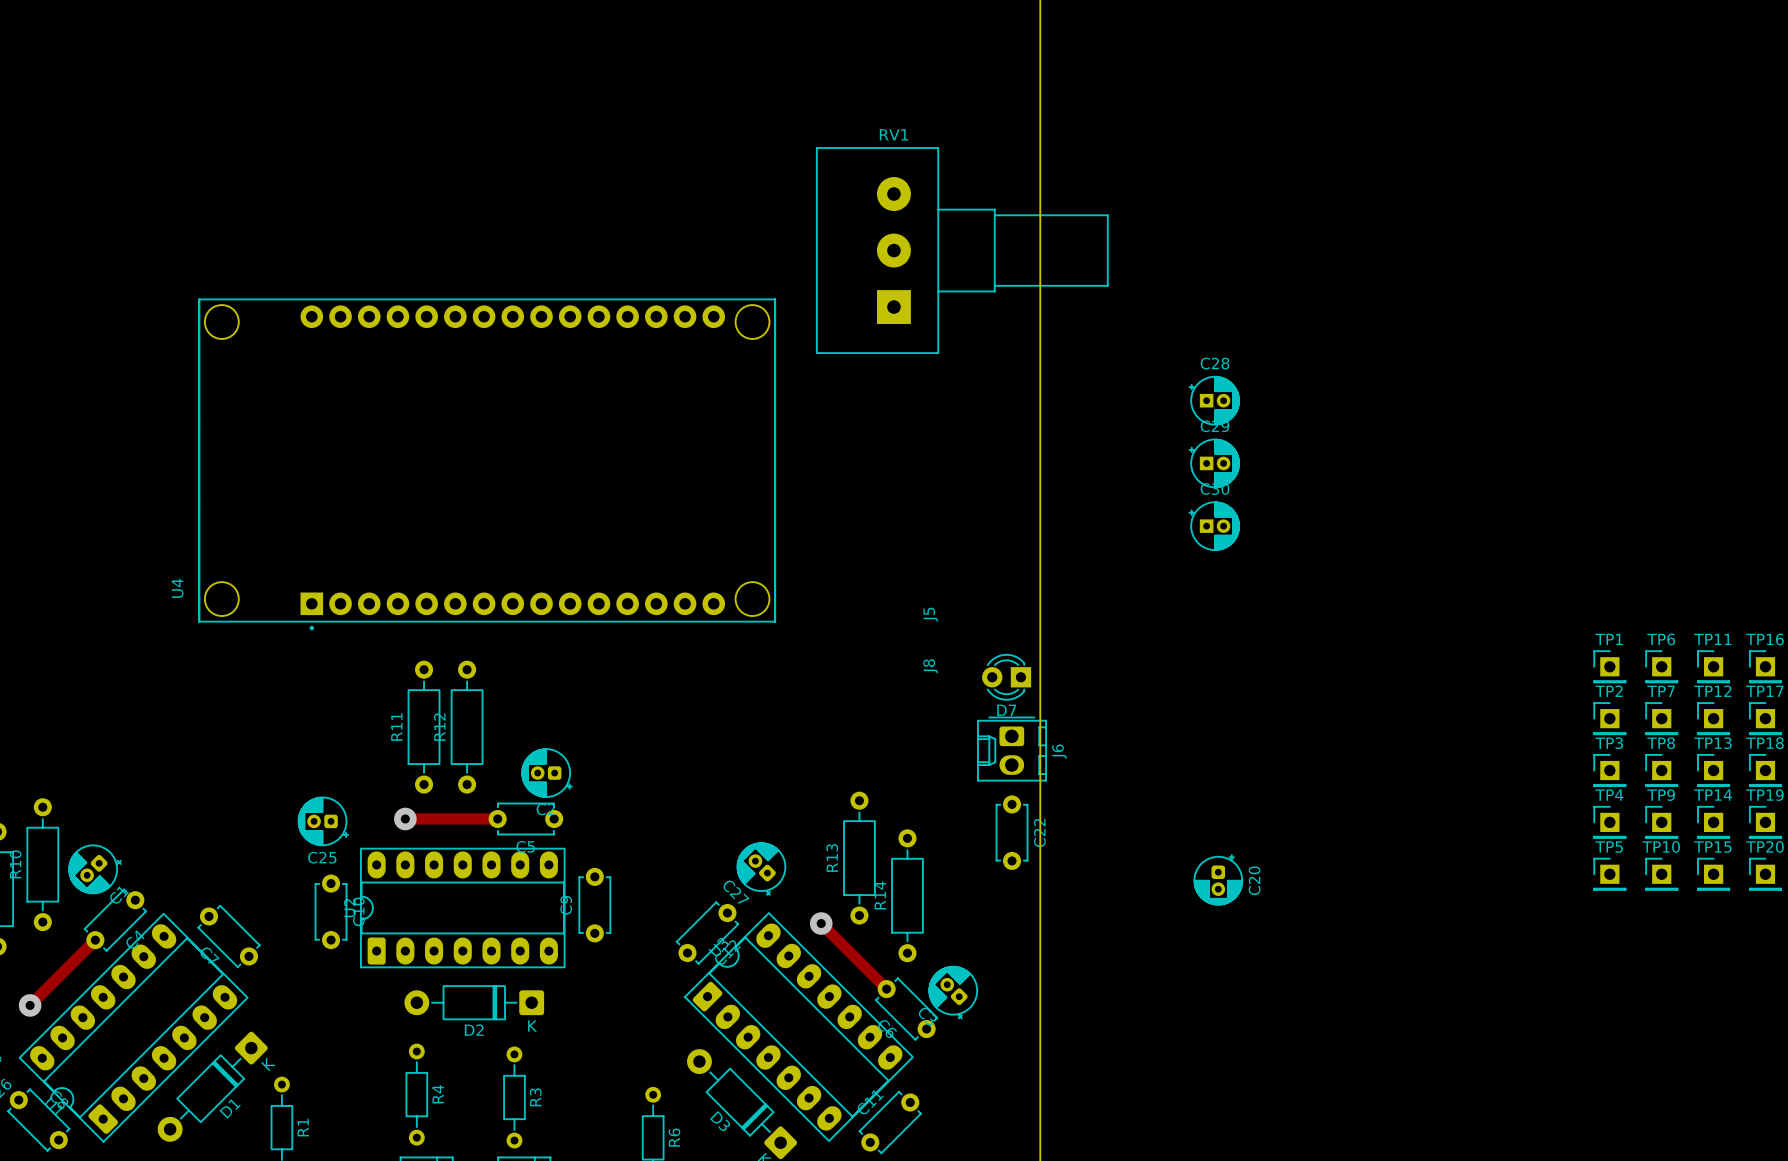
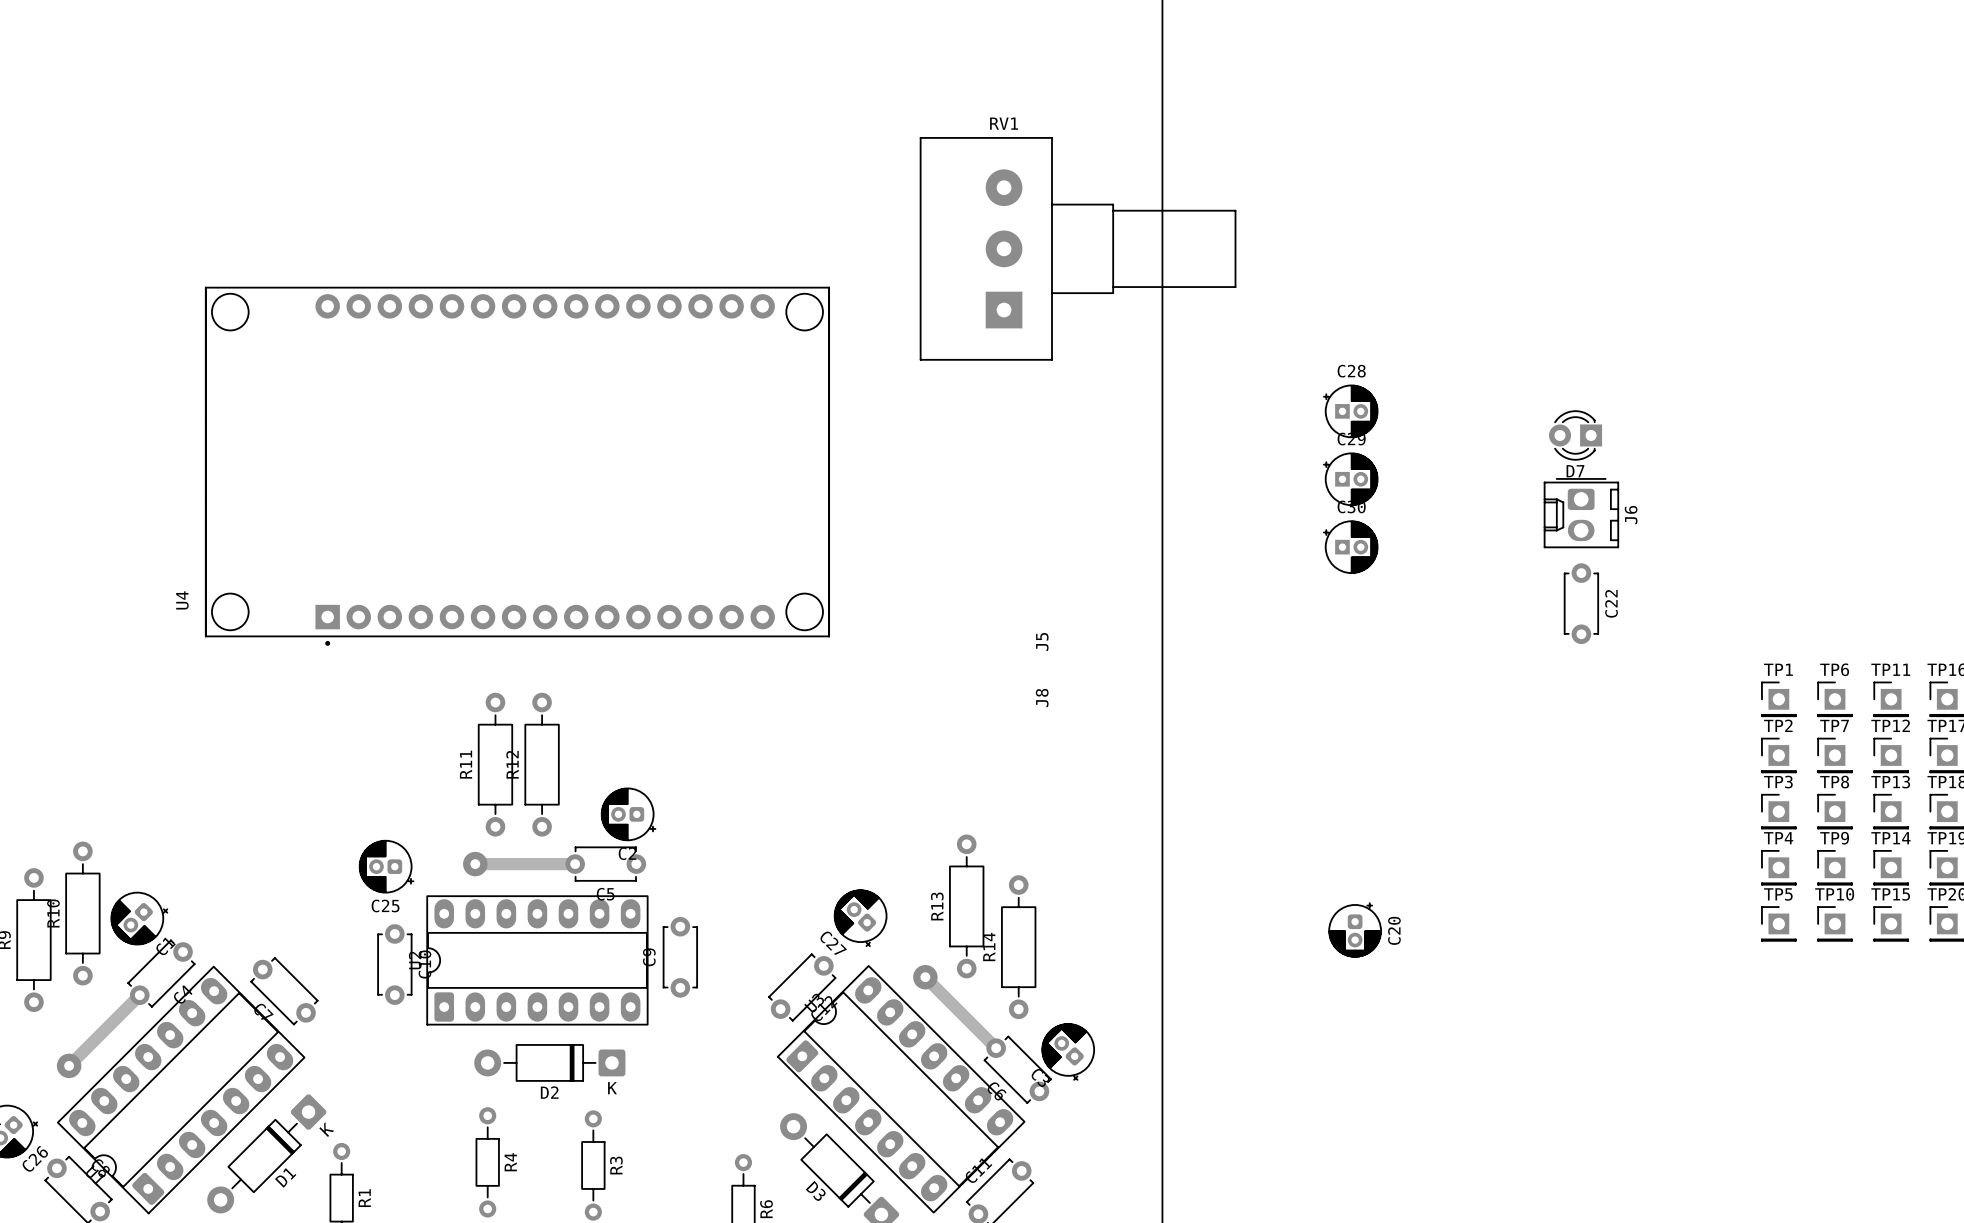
U4 position: (487, 464) -> (517, 466)
D7 position: (1006, 677) -> (1575, 435)
J6 position: (1012, 749) -> (1581, 513)
C22 position: (1012, 832) -> (1581, 603)

